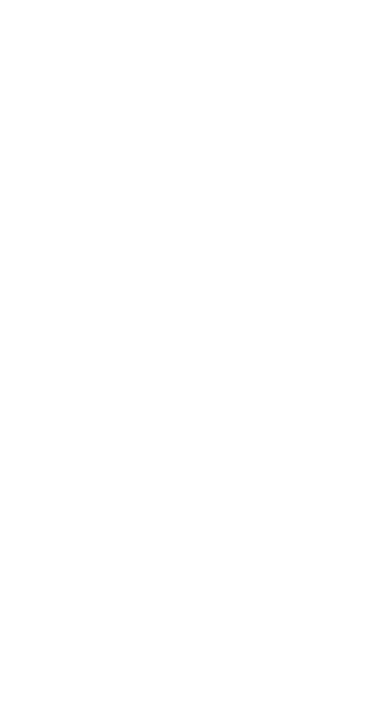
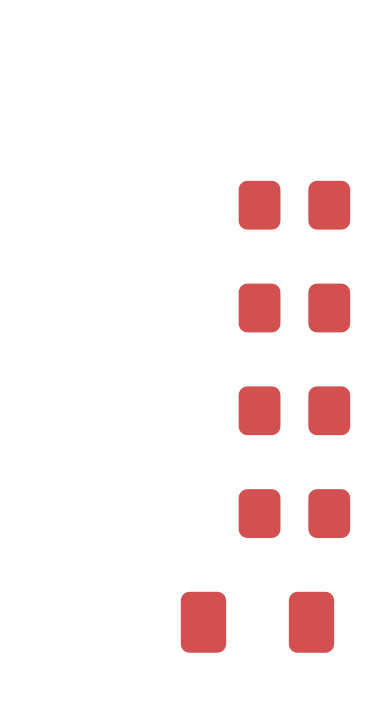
part: none -> (294, 205)
part: none -> (294, 307)
part: none -> (294, 410)
part: none -> (294, 513)
part: none -> (257, 622)

